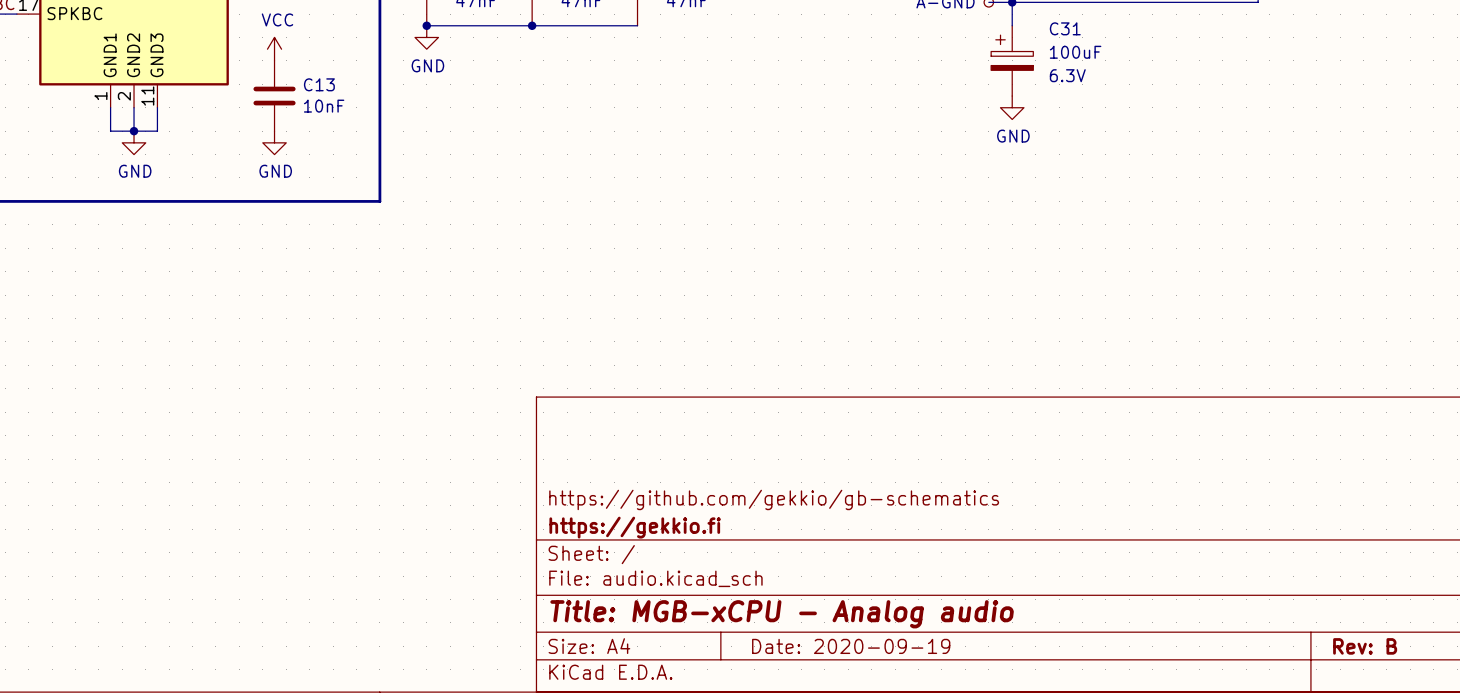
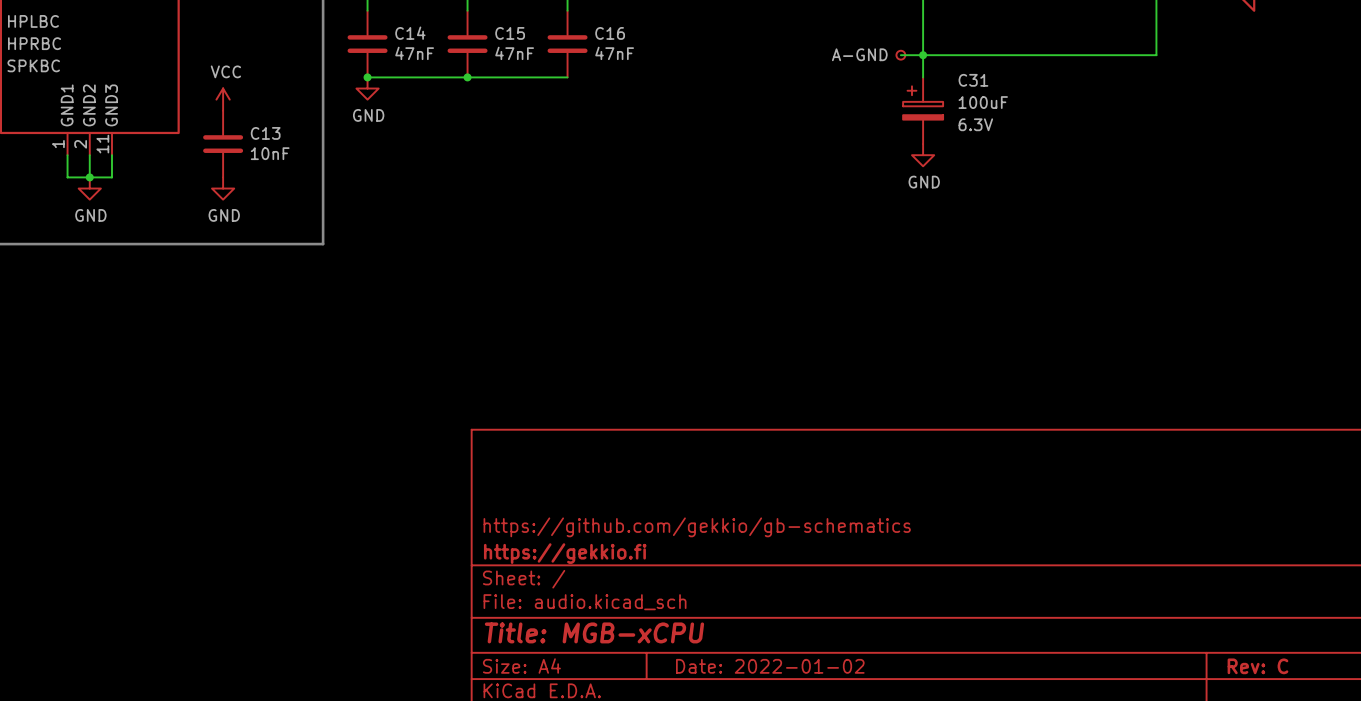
title block: Title: MGB-xCPU - Analog audio (782, 614) -> Title: MGB-xCPU (594, 632)
title block: Date: 2020-09-19 (851, 646) -> Date: 2022-01-02 (770, 666)
title block: Rev: B (1365, 646) -> Rev: C (1257, 666)

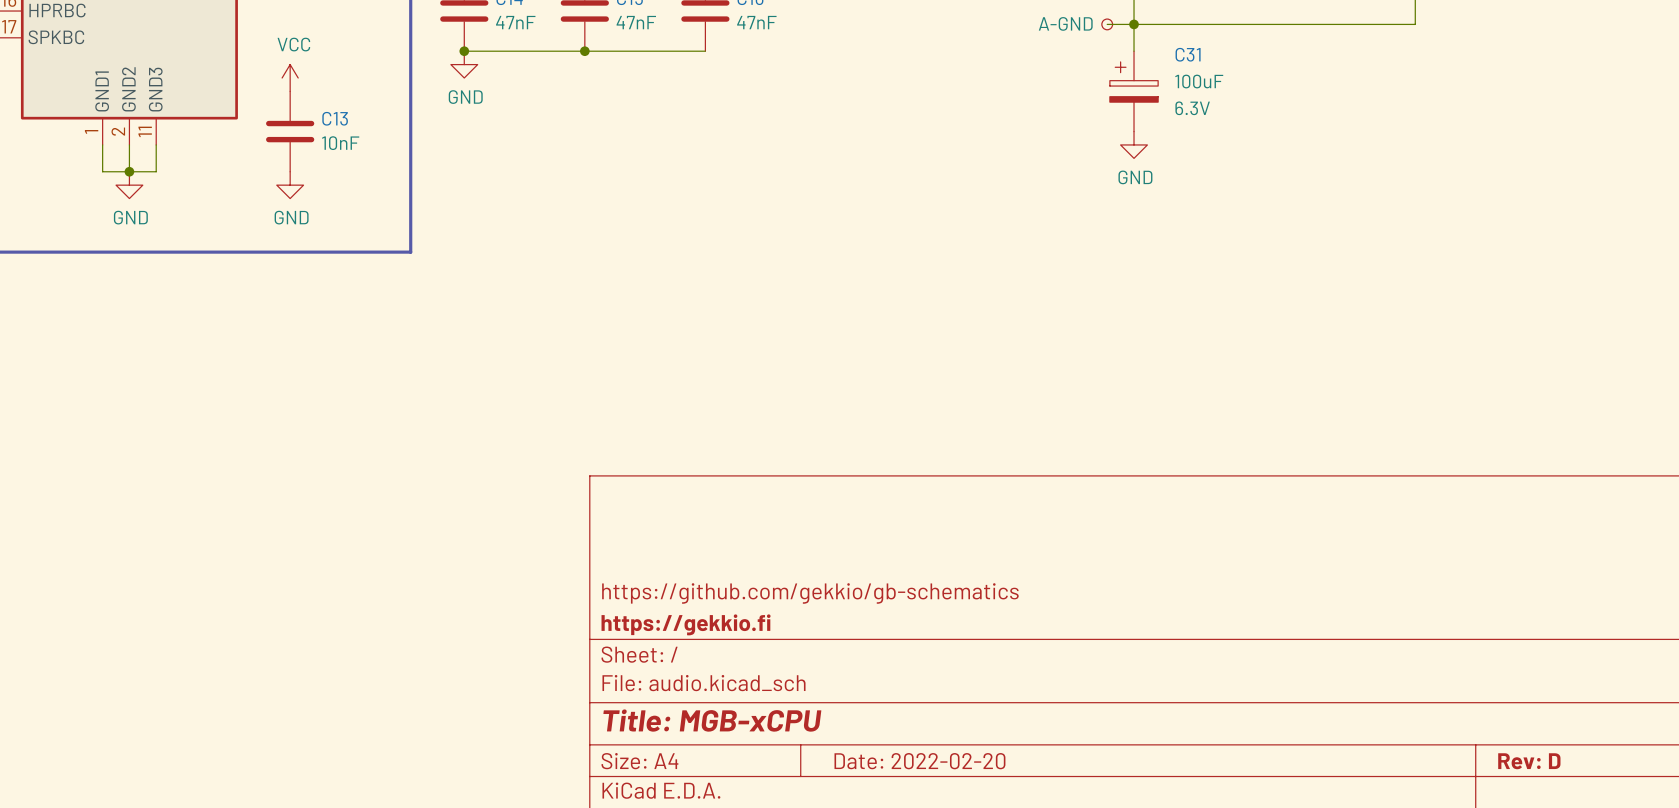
title block: Date: 2022-01-02 (770, 666) -> Date: 2022-02-20 (919, 761)
title block: Rev: C (1257, 666) -> Rev: D (1529, 761)

